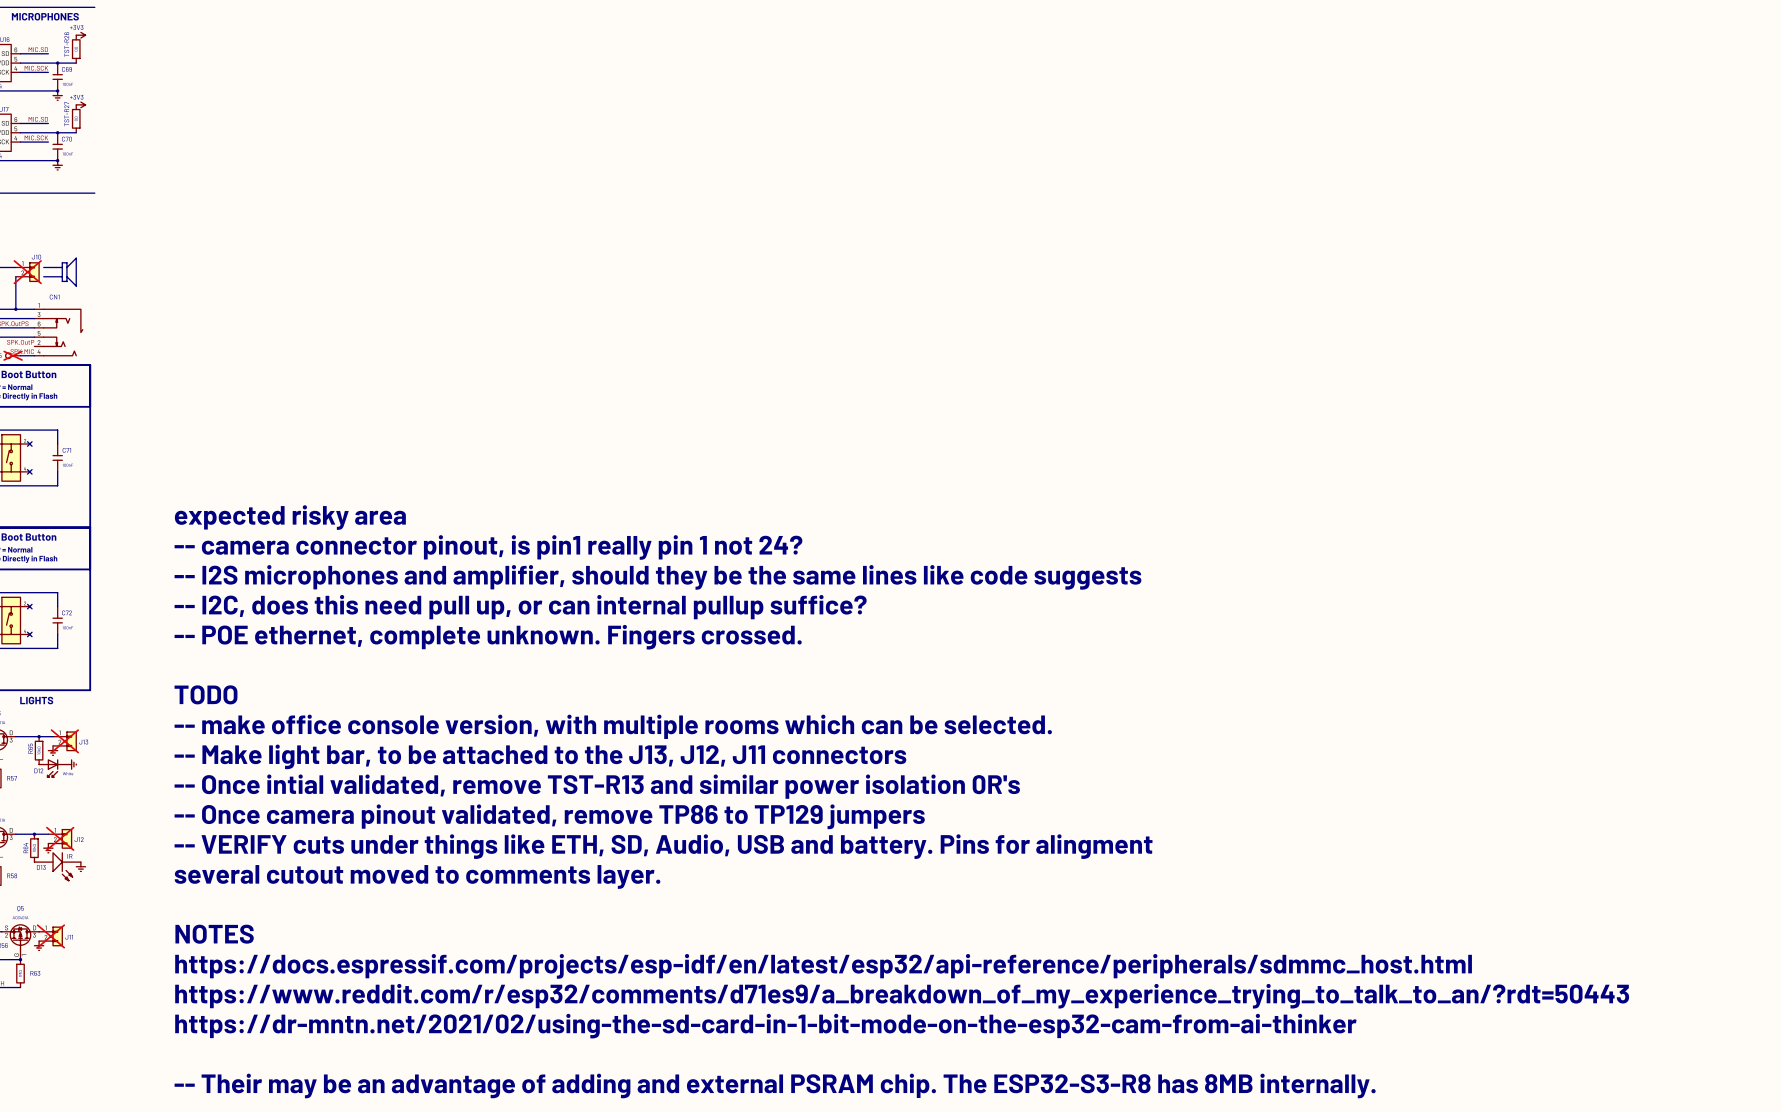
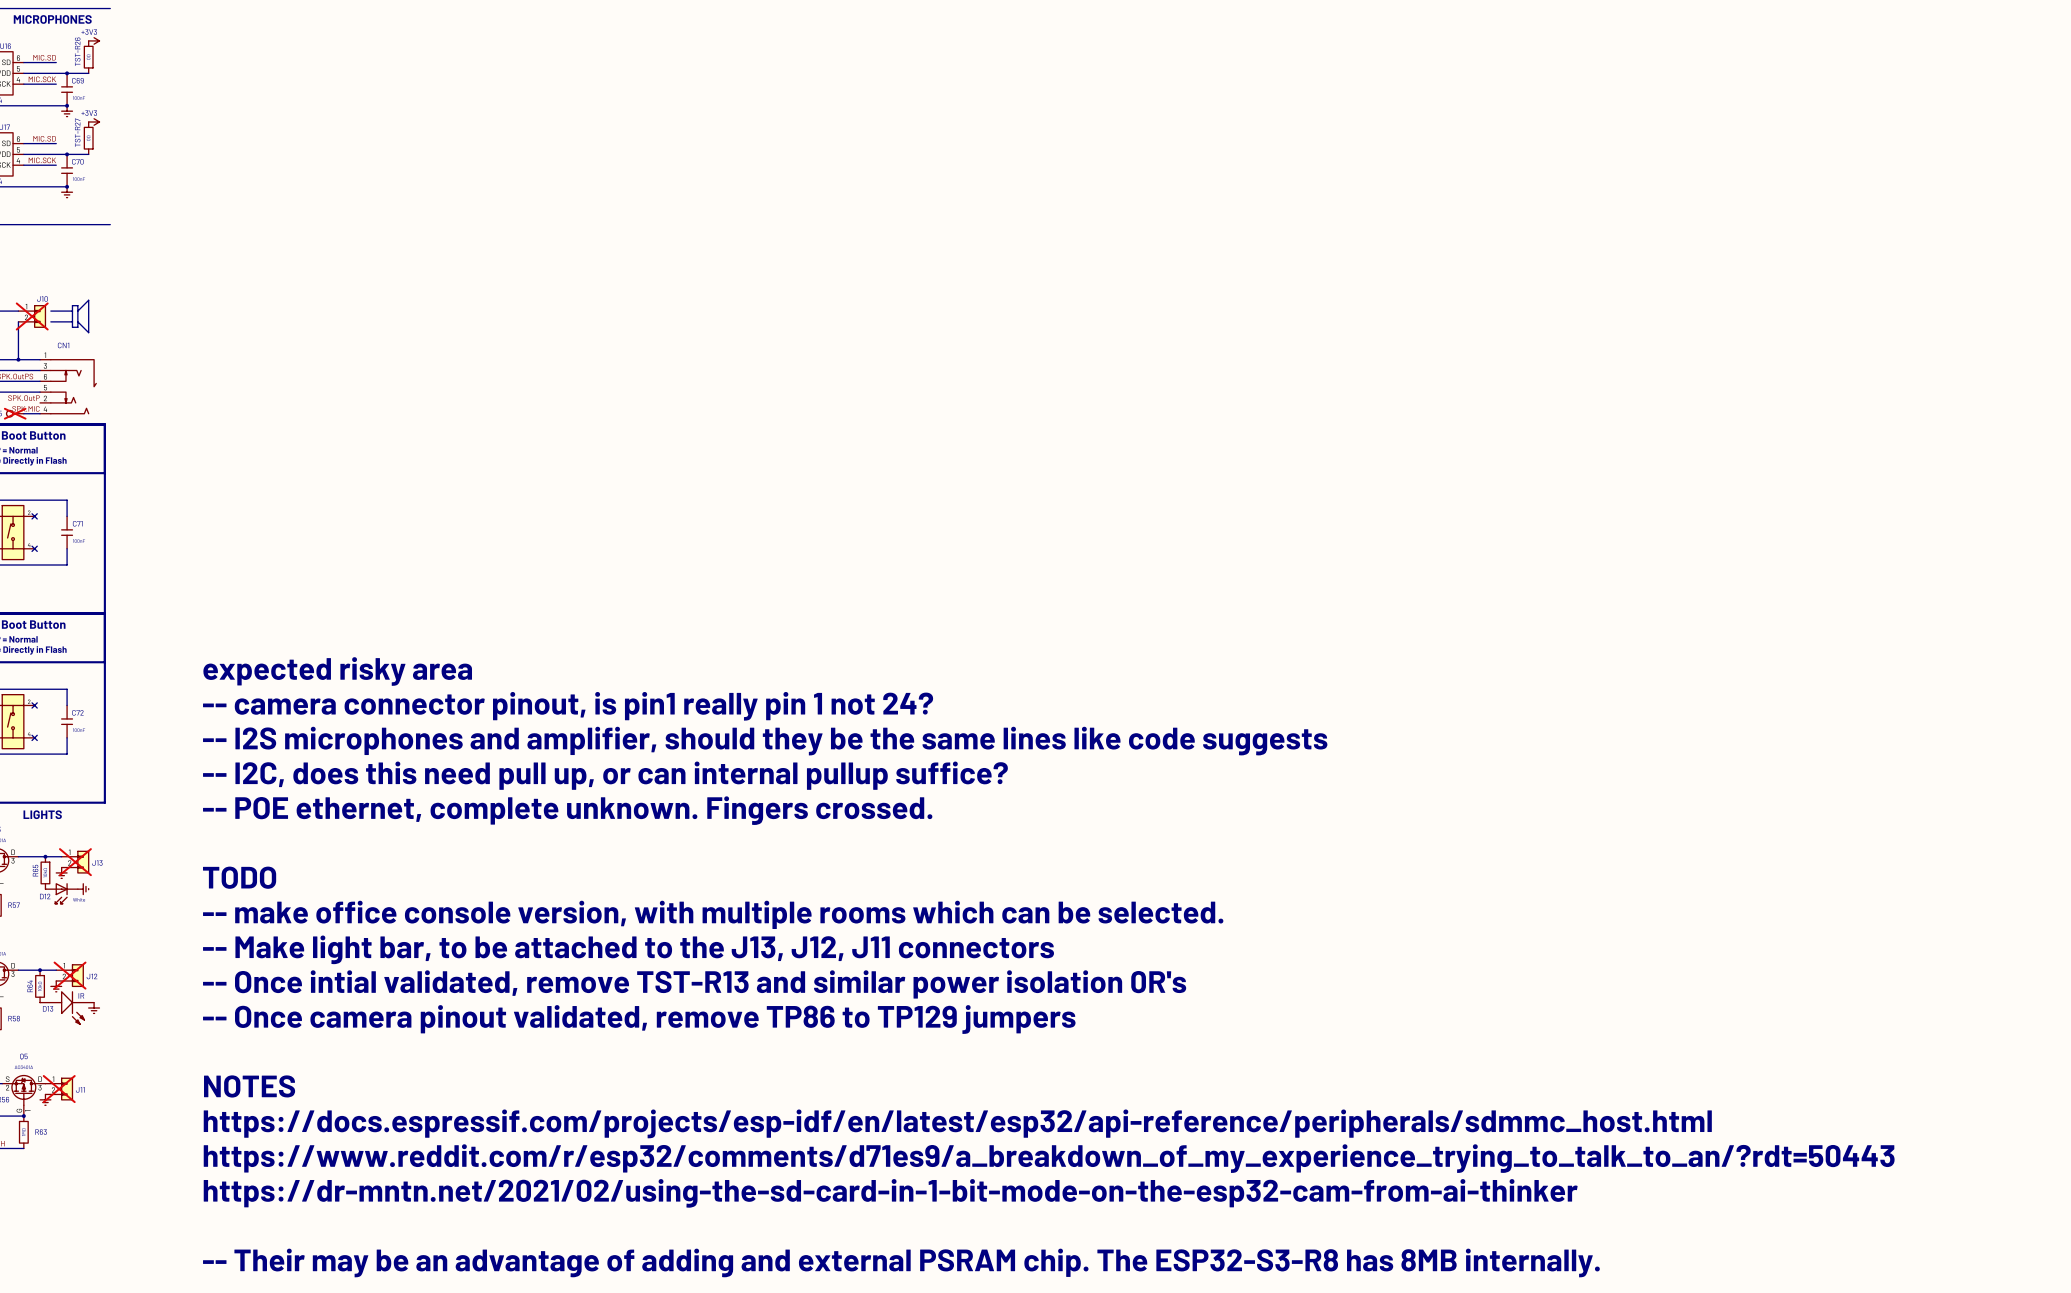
text: expected risky area (290, 517) -> none
text: -- camera connector pinout, is pin1 really pin 1 not 24? (488, 547) -> none
text: -- I2S microphones and amplifier, should they be the same lines like code suggests (657, 577) -> expected risky area (337, 671)
text: -- I2C, does this need pull up, or can internal pullup suffice? (520, 607) -> -- camera connector pinout, is pin1 really pin 1 not 24? (568, 706)
text: -- POE ethernet, complete unknown. Fingers crossed. (488, 637) -> -- I2S microphones and amplifier, should they be the same lines like code suggests (765, 741)
text: none -> -- I2C, does this need pull up, or can internal pullup suffice? (605, 775)
text: TODO (206, 694) -> -- POE ethernet, complete unknown. Fingers crossed. (567, 810)
text: -- make office console version, with multiple rooms which can be selected. (613, 726) -> none
text: -- Make light bar, to be attached to the J13, J12, J11 connectors (540, 756) -> TODO (239, 877)
text: -- Once intial validated, remove TST-R13 and similar power isolation 0R's (597, 786) -> -- make office console version, with multiple rooms which can be selected. (713, 914)
text: -- Once camera pinout validated, remove TP86 to TP129 jumpers (549, 816) -> -- Make light bar, to be attached to the J13, J12, J11 connectors (628, 949)
text: -- VERIFY cuts under things like ETH, SD, Audio, USB and battery. Pins for alingment (663, 846) -> -- Once intial validated, remove TST-R13 and similar power isolation 0R's (694, 984)
text: several cutout moved to comments layer. (417, 876) -> -- Once camera pinout validated, remove TP86 to TP129 jumpers (639, 1019)

